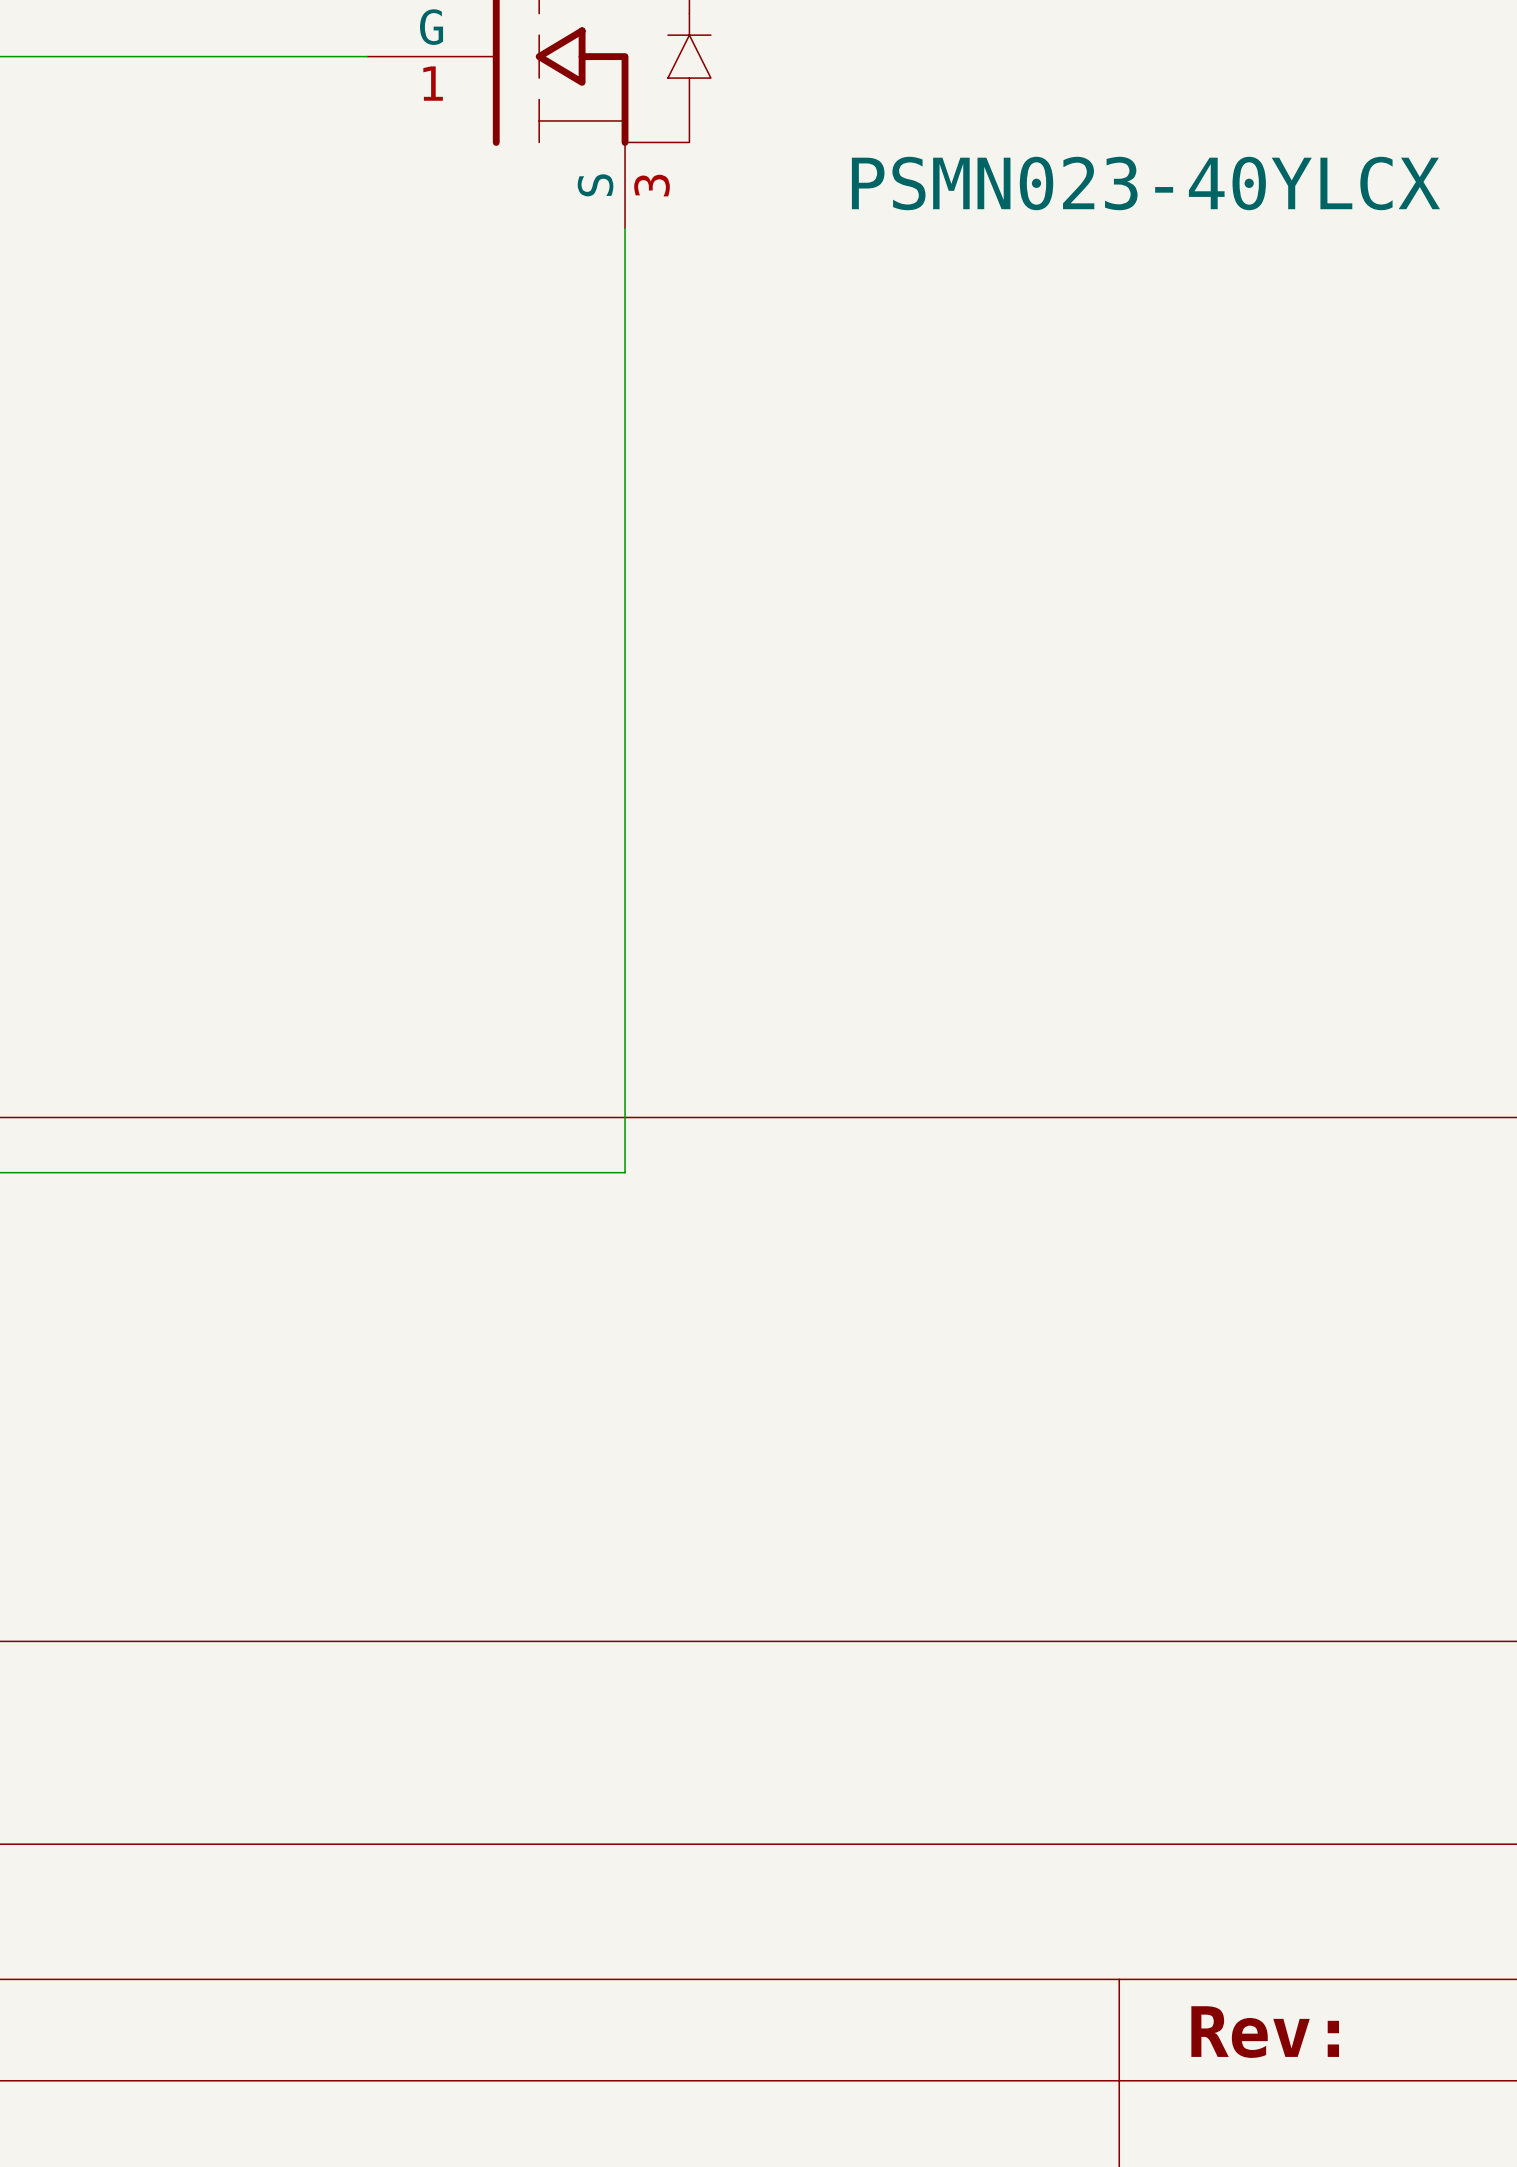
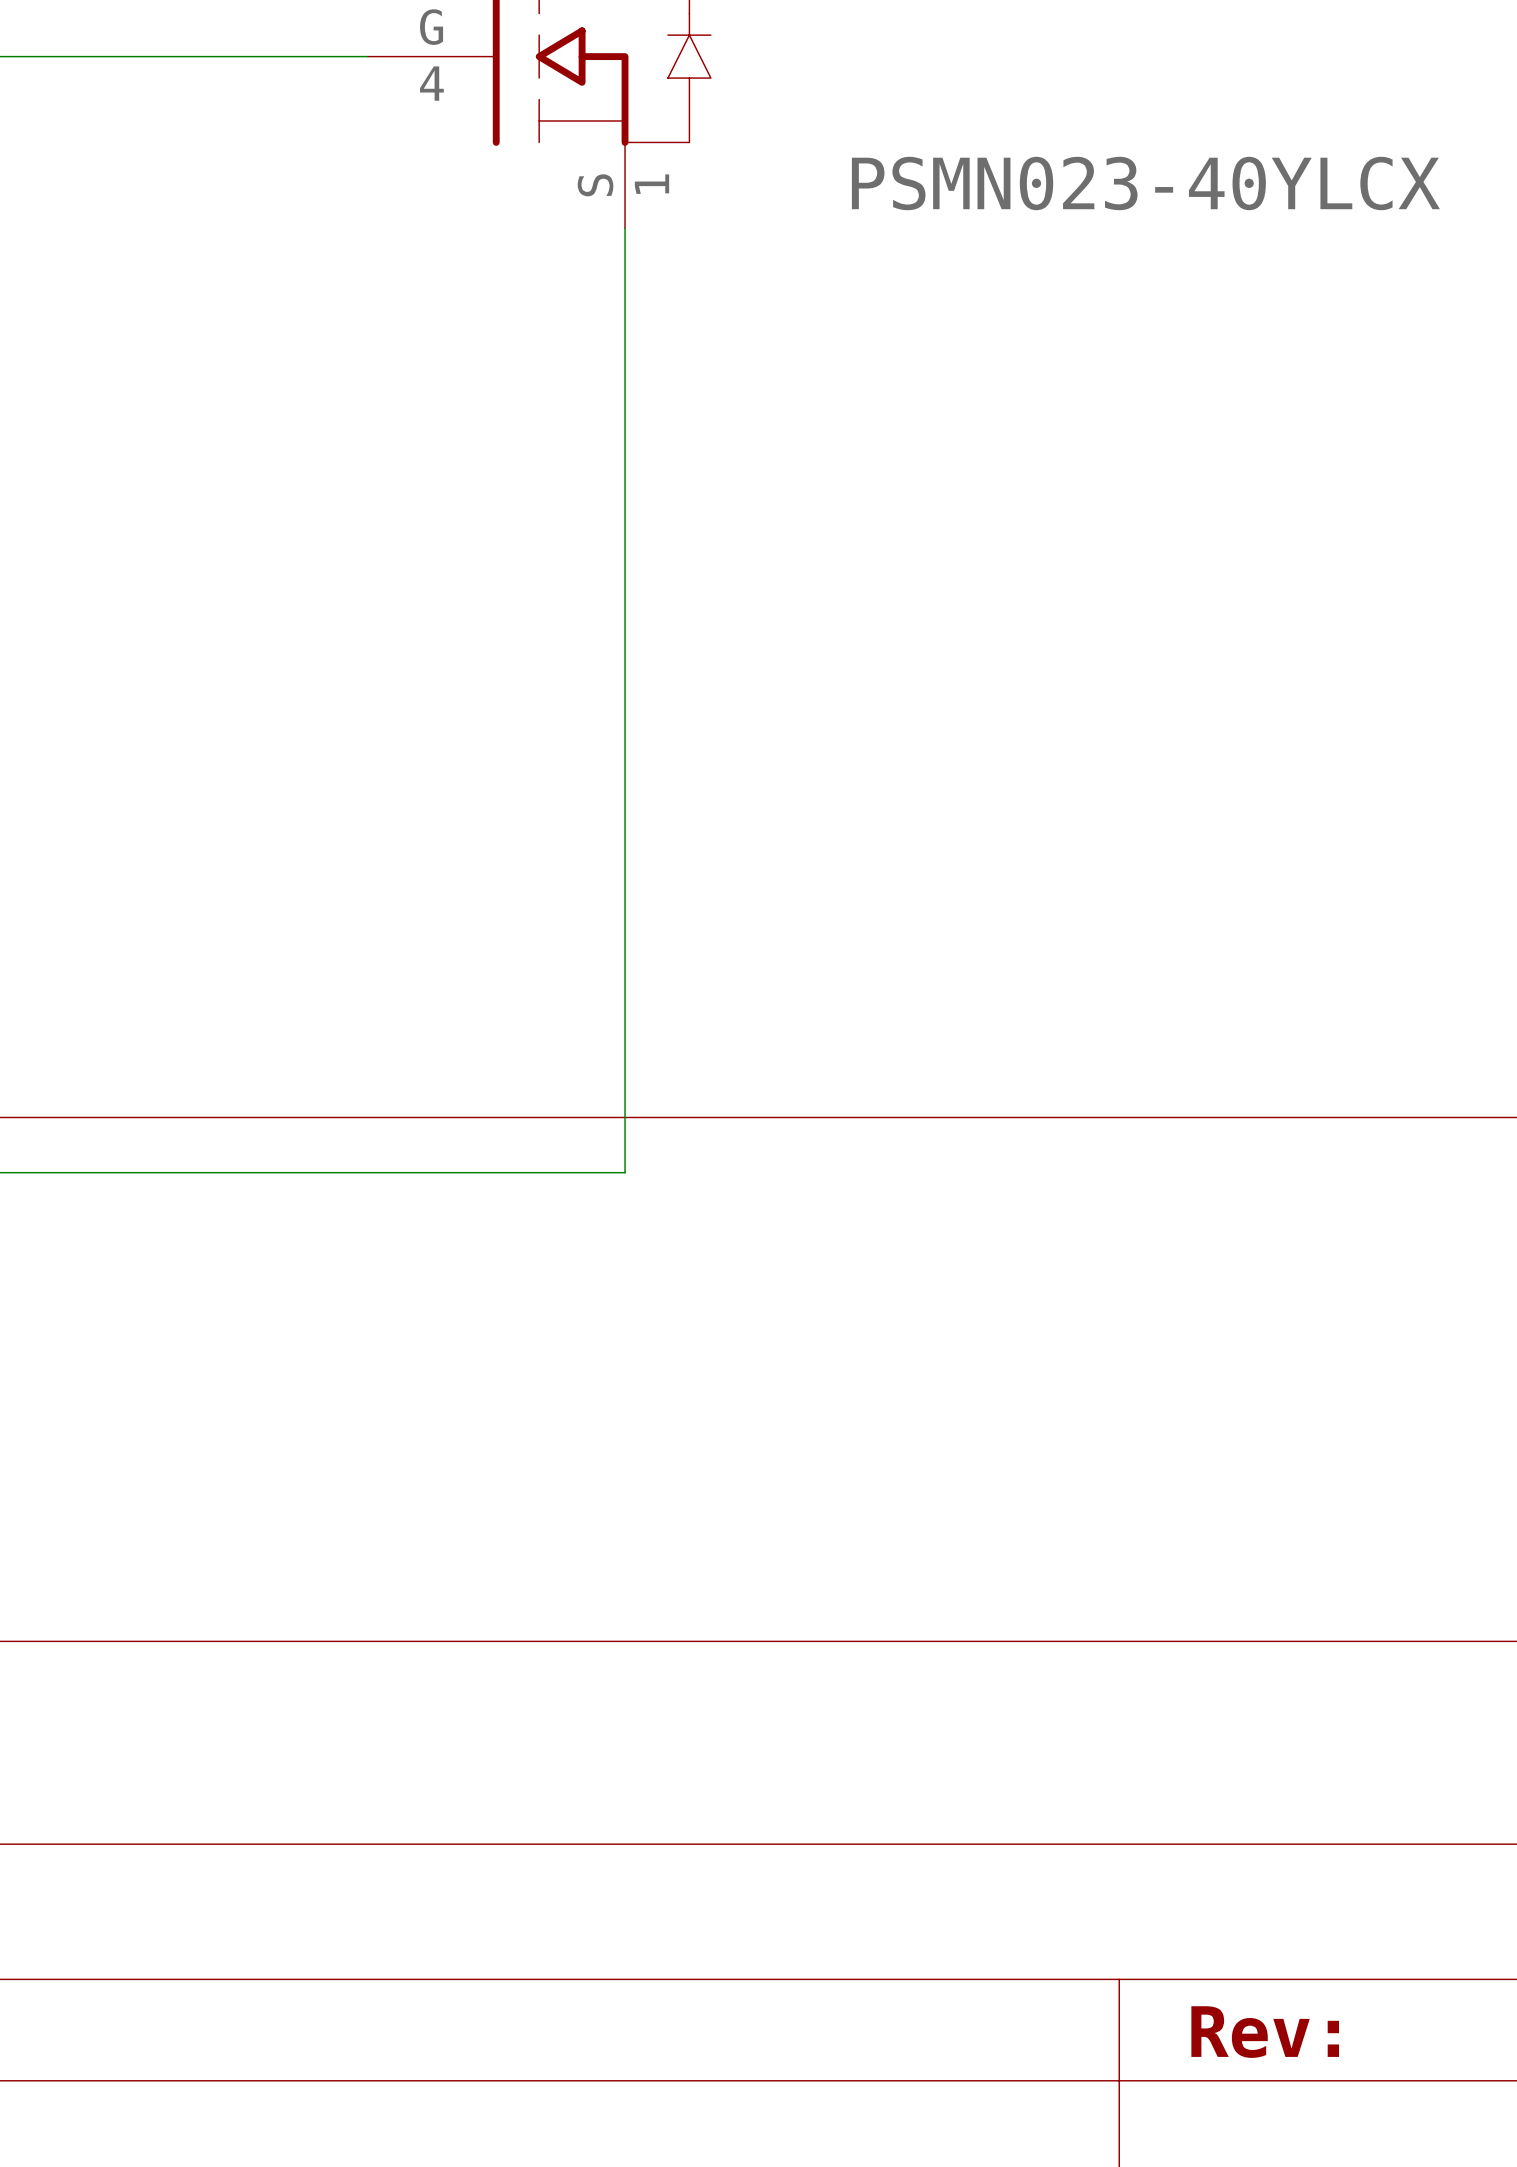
part pin number: 1 (433, 83) -> 4 (431, 83)
part pin number: 3 (652, 185) -> 1 (651, 184)

